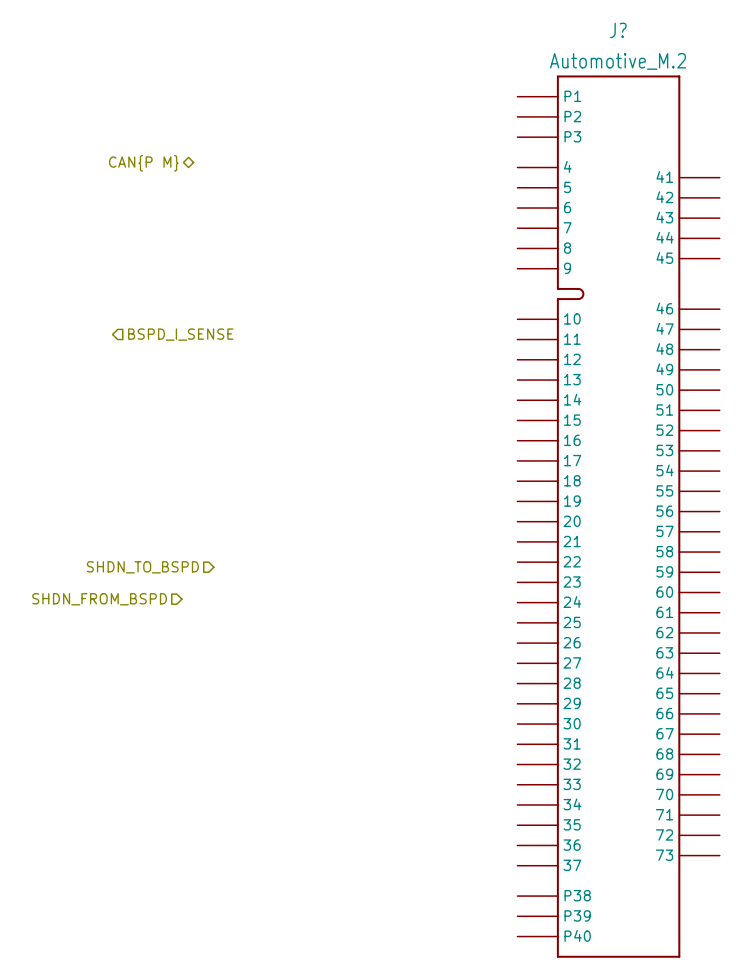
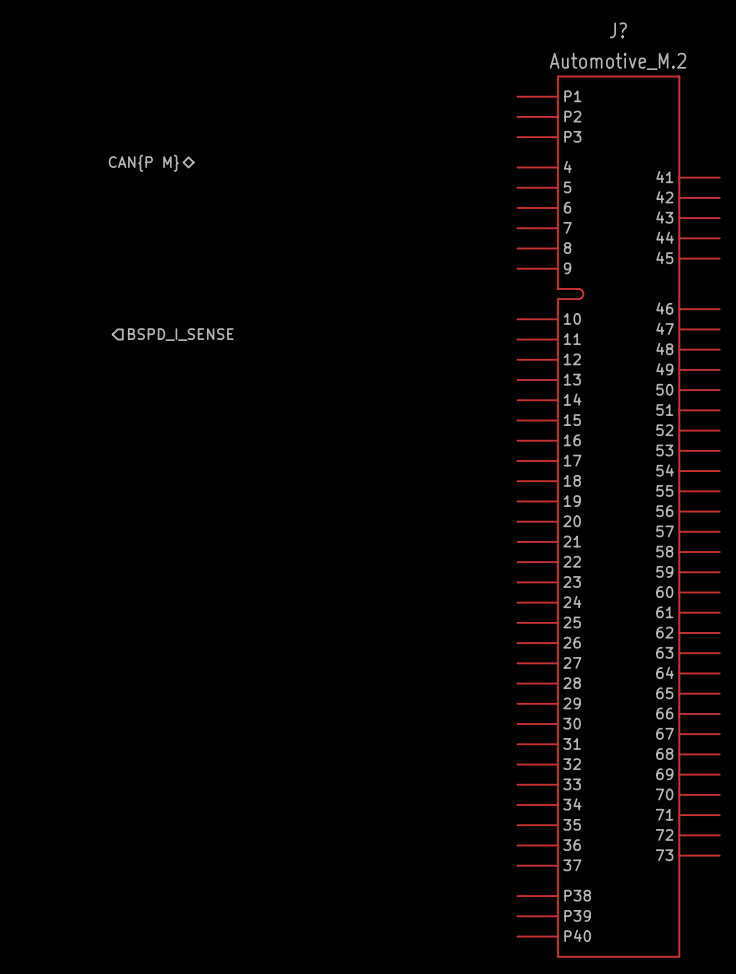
hierarchical label: SHDN_TO_BSPD (142, 567) -> none
hierarchical label: SHDN_FROM_BSPD (99, 599) -> none

